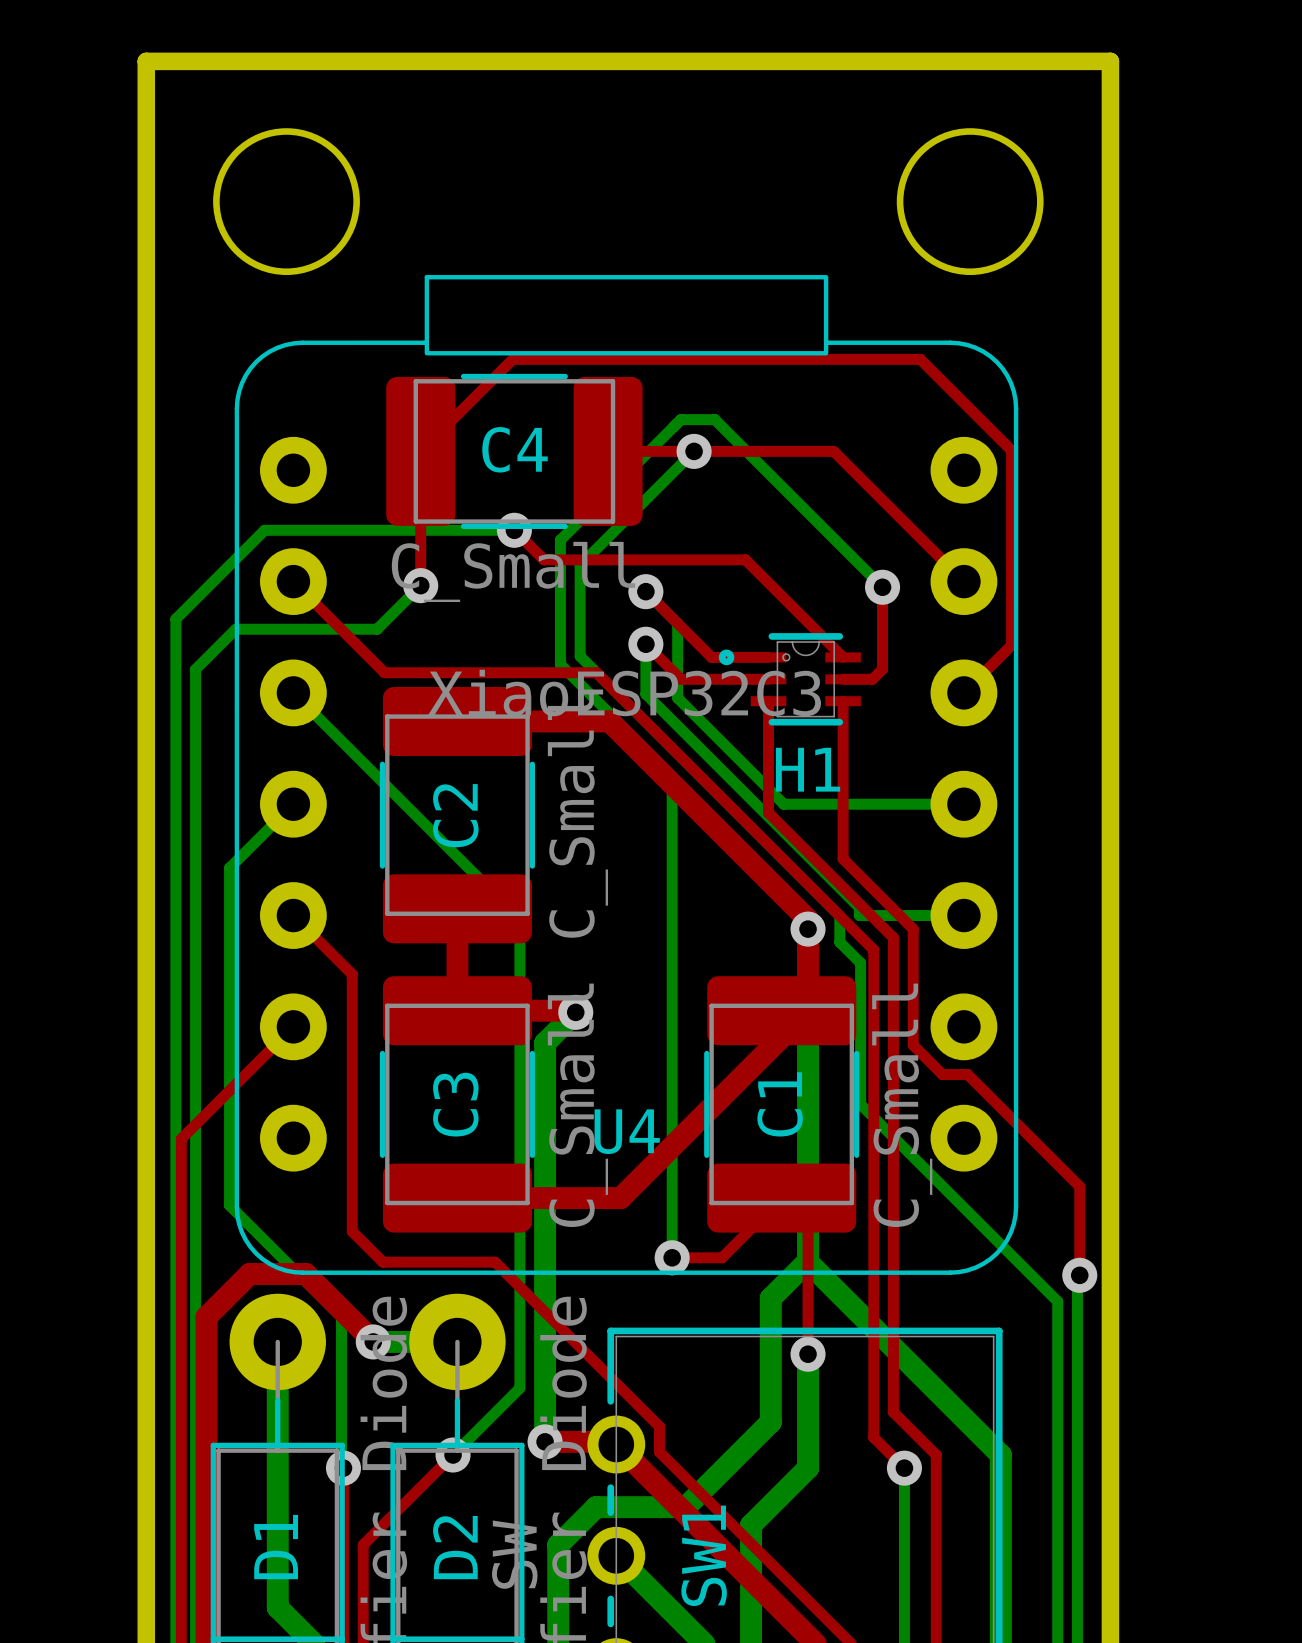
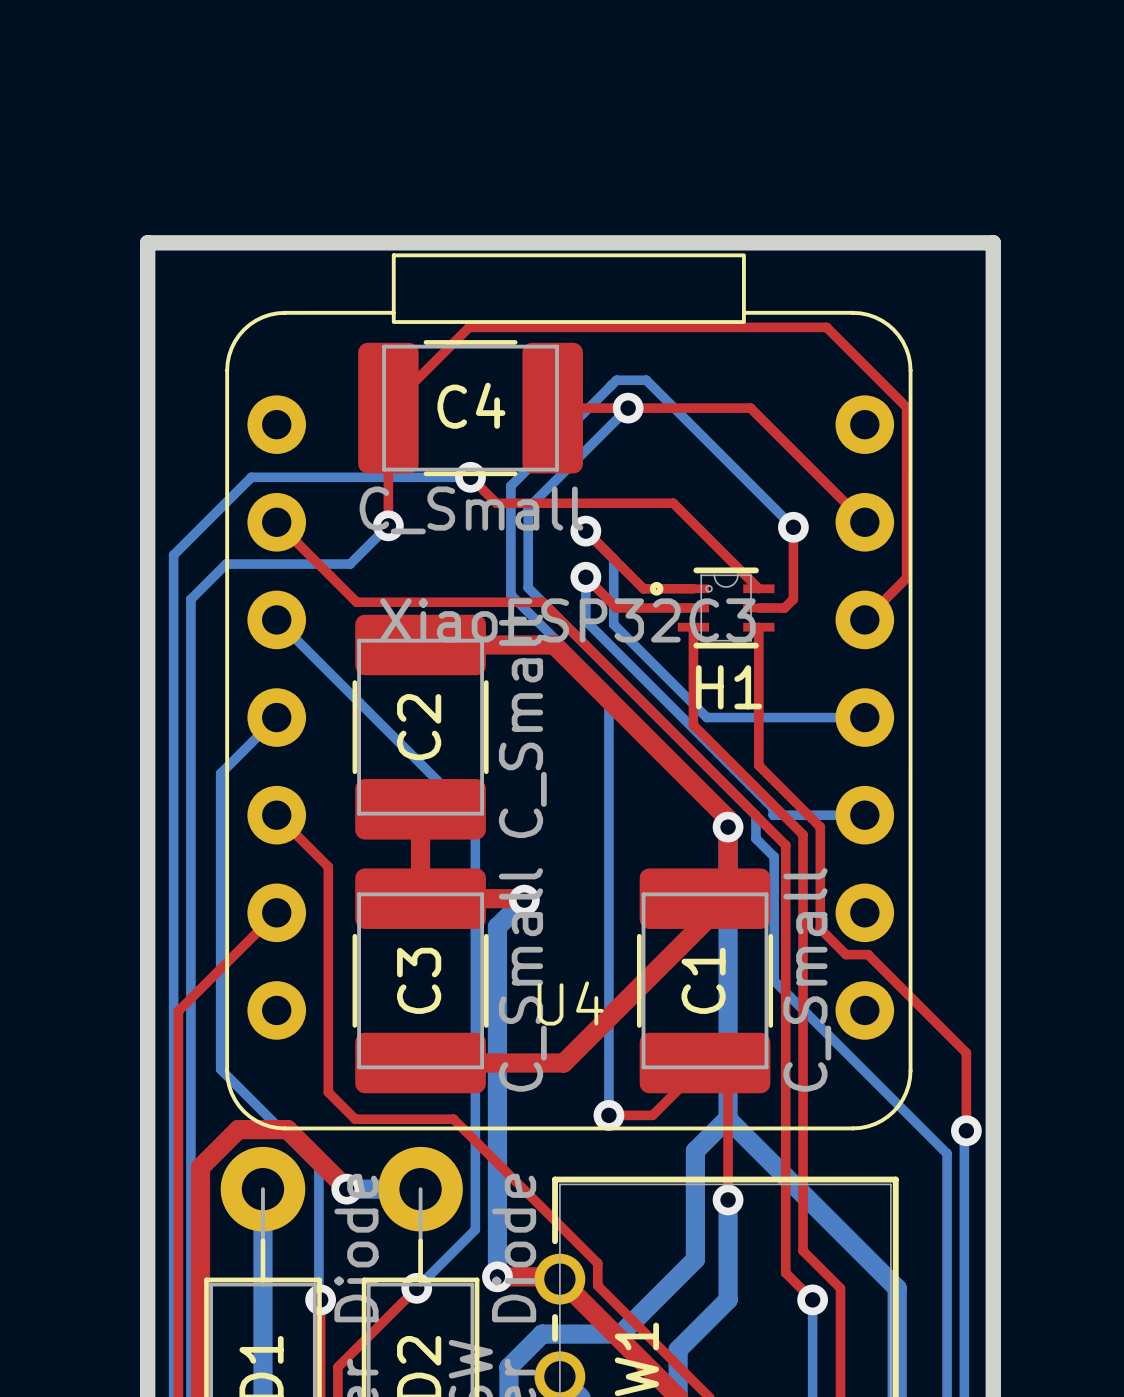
round board edge: [213, 128, 360, 276] -> none
round board edge: [896, 128, 1044, 276] -> none
board edge: (146, 262) (146, 61) (1110, 61) (1110, 262) -> (147, 242) (993, 242)

